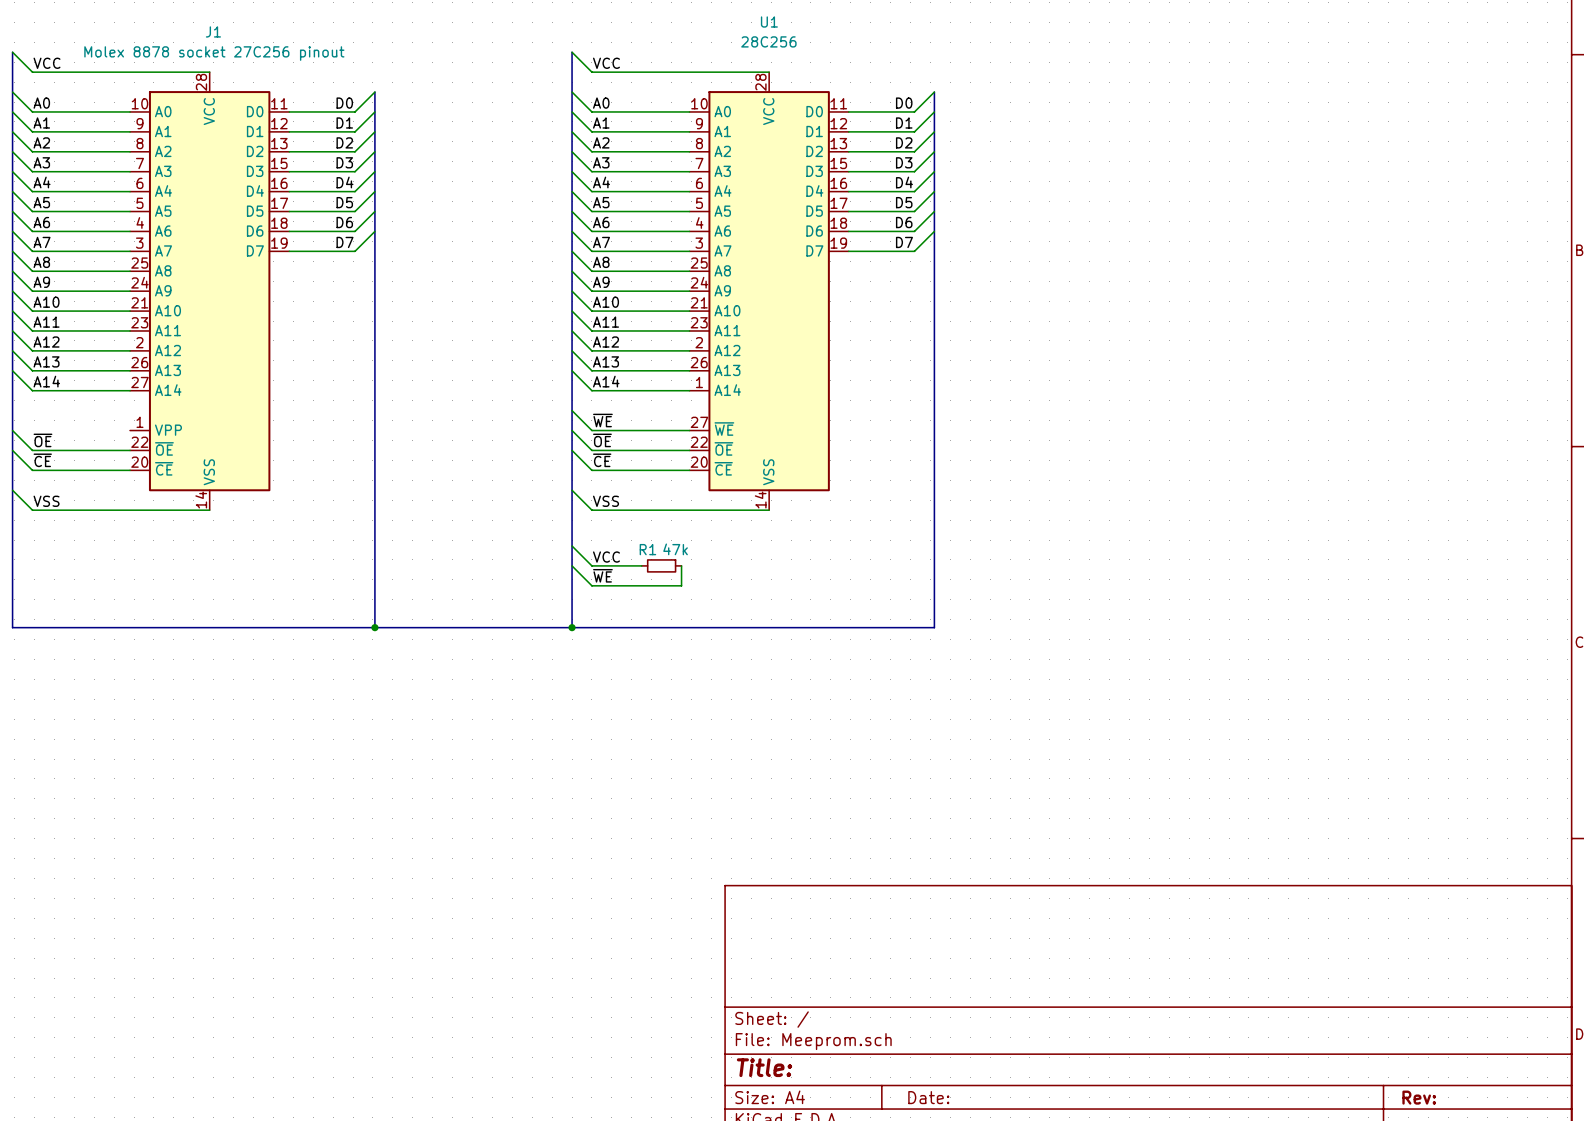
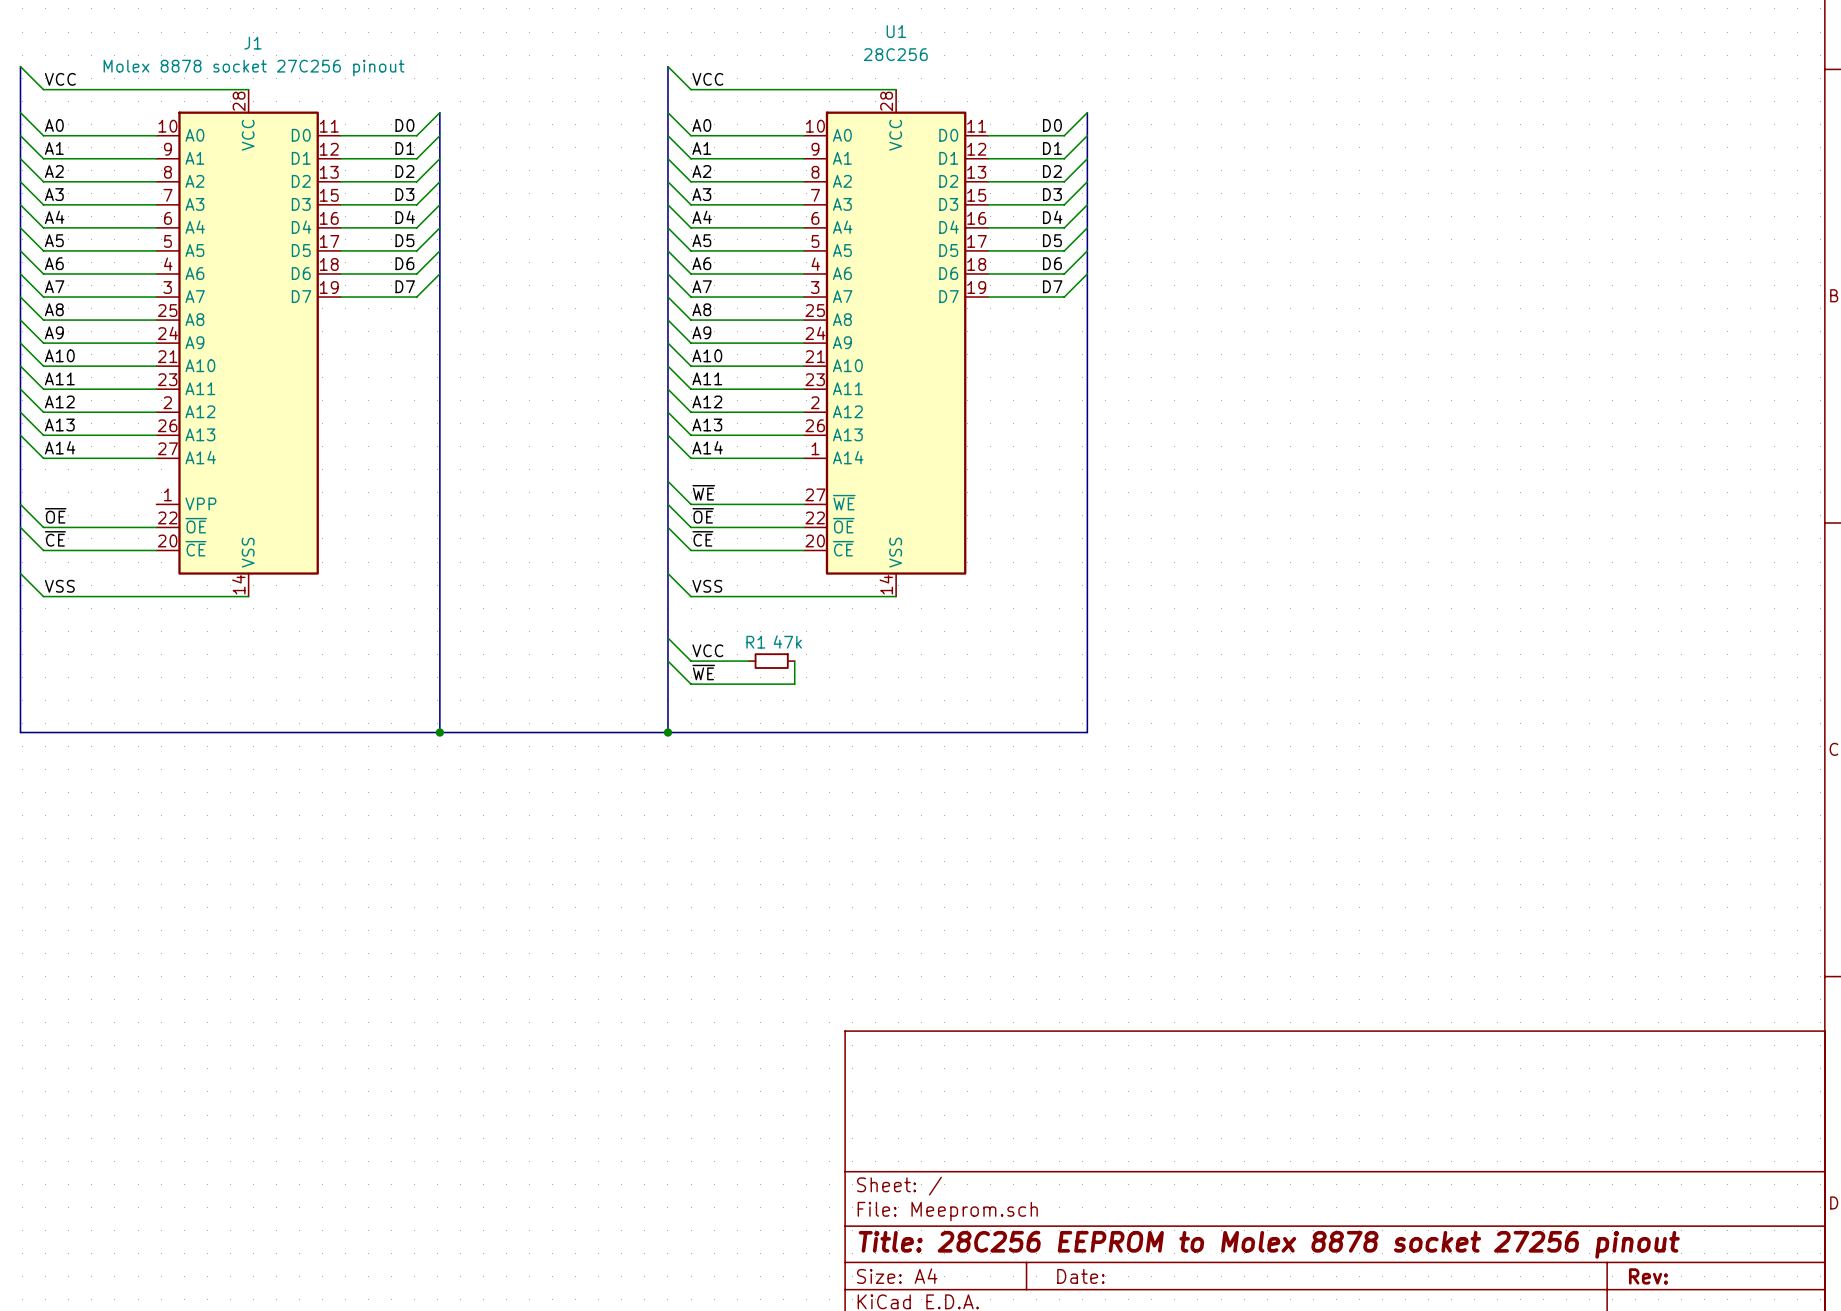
title block: Title: (764, 1067) -> Title: 28C256 EEPROM to Molex 8878 socket 27256 pinout (1269, 1244)

